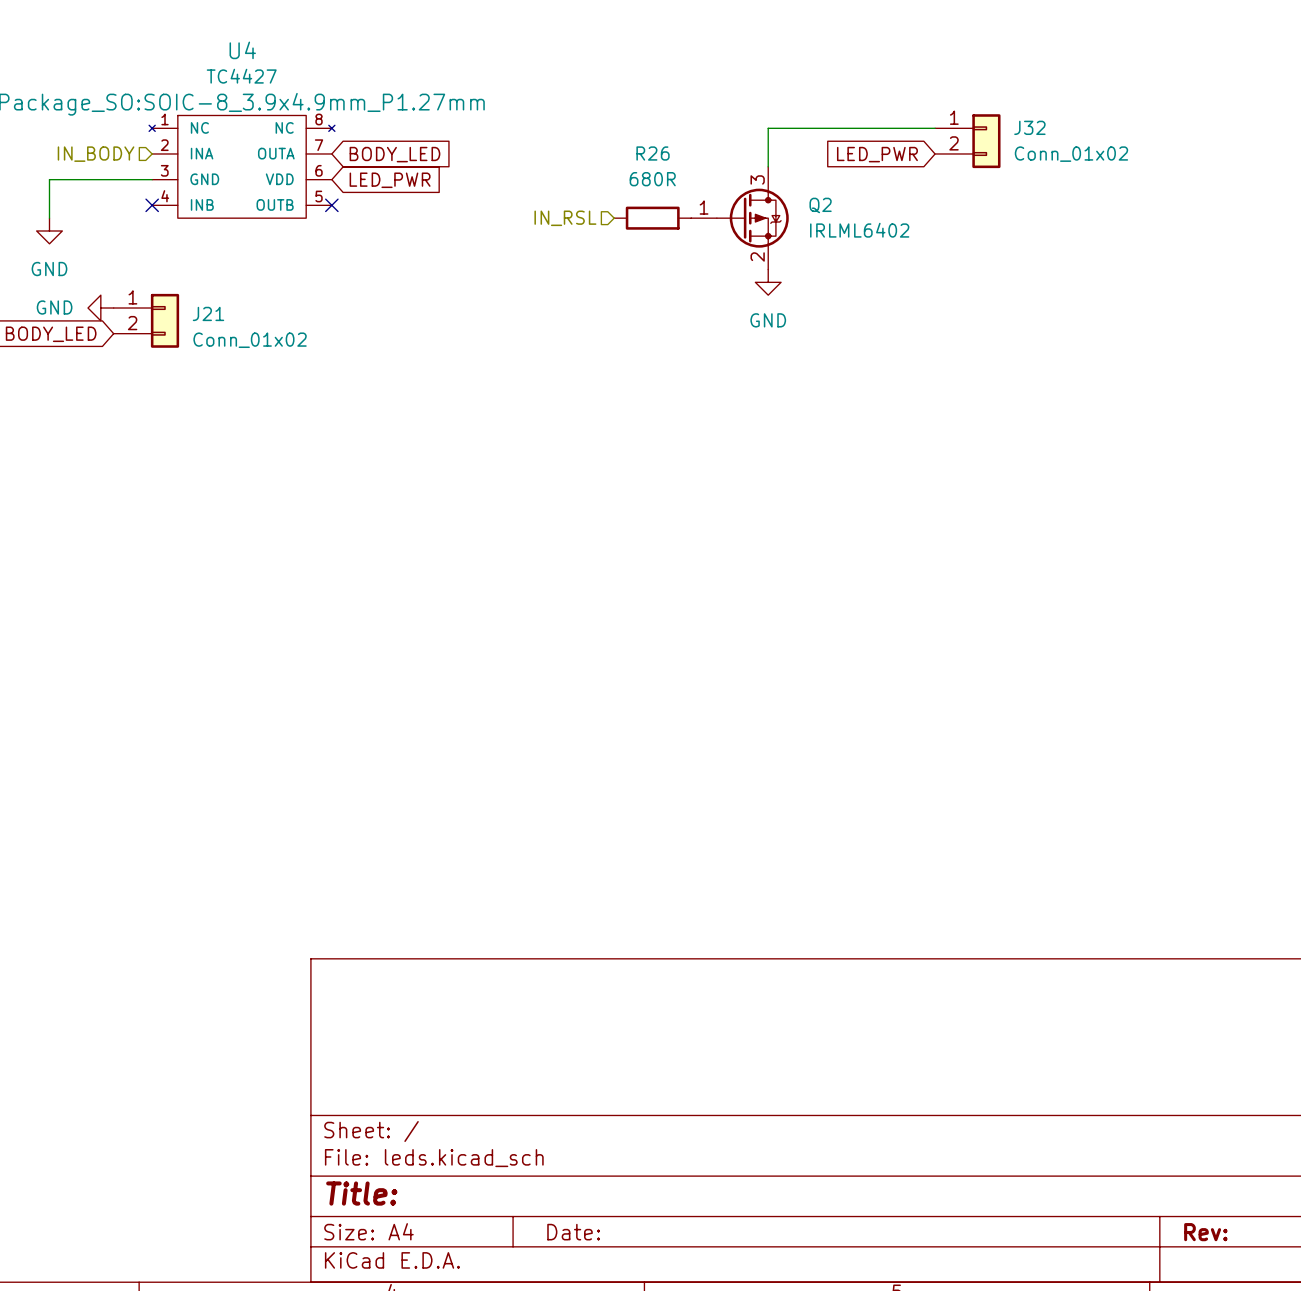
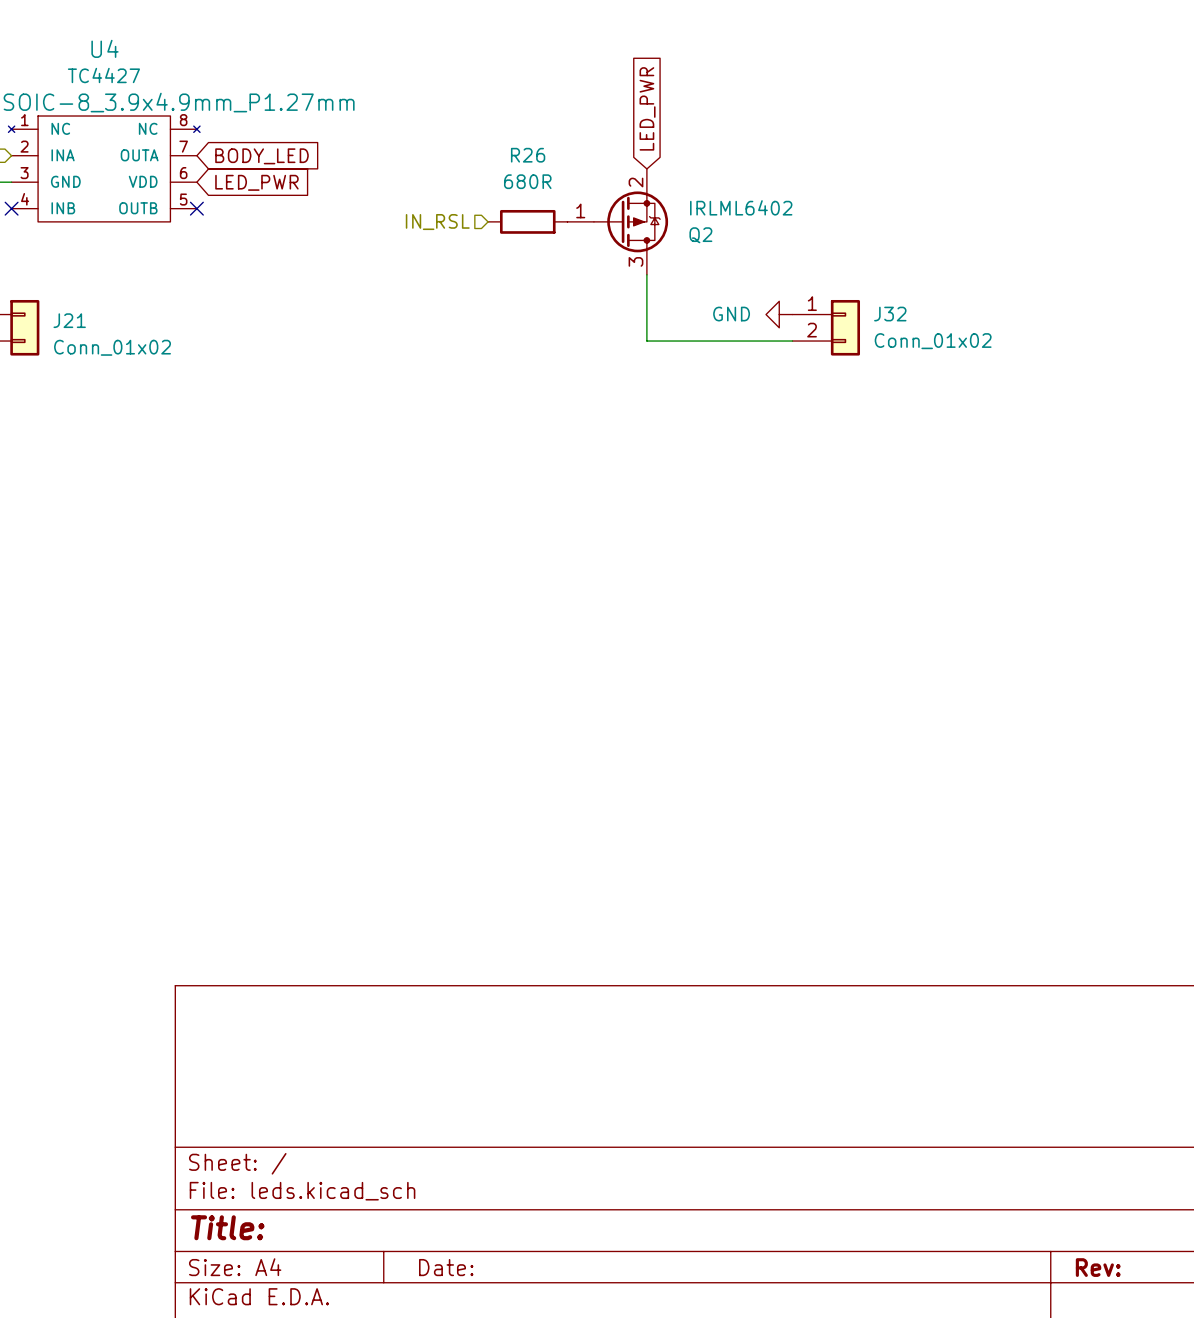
wire: (935, 128) (768, 128) (768, 166) -> none
J32 position: (967, 141) -> (826, 327)
global label rotation: 0° (877, 154) -> 90° clockwise (647, 108)
Q2 flip: as is (752, 218) -> up-down (631, 221)
wire: none -> (646, 274) (646, 341) (792, 341)
power symbol rotation: 0° (768, 282) -> 90° clockwise (779, 314)
power symbol position: GND (768, 282) -> GND (779, 314)

